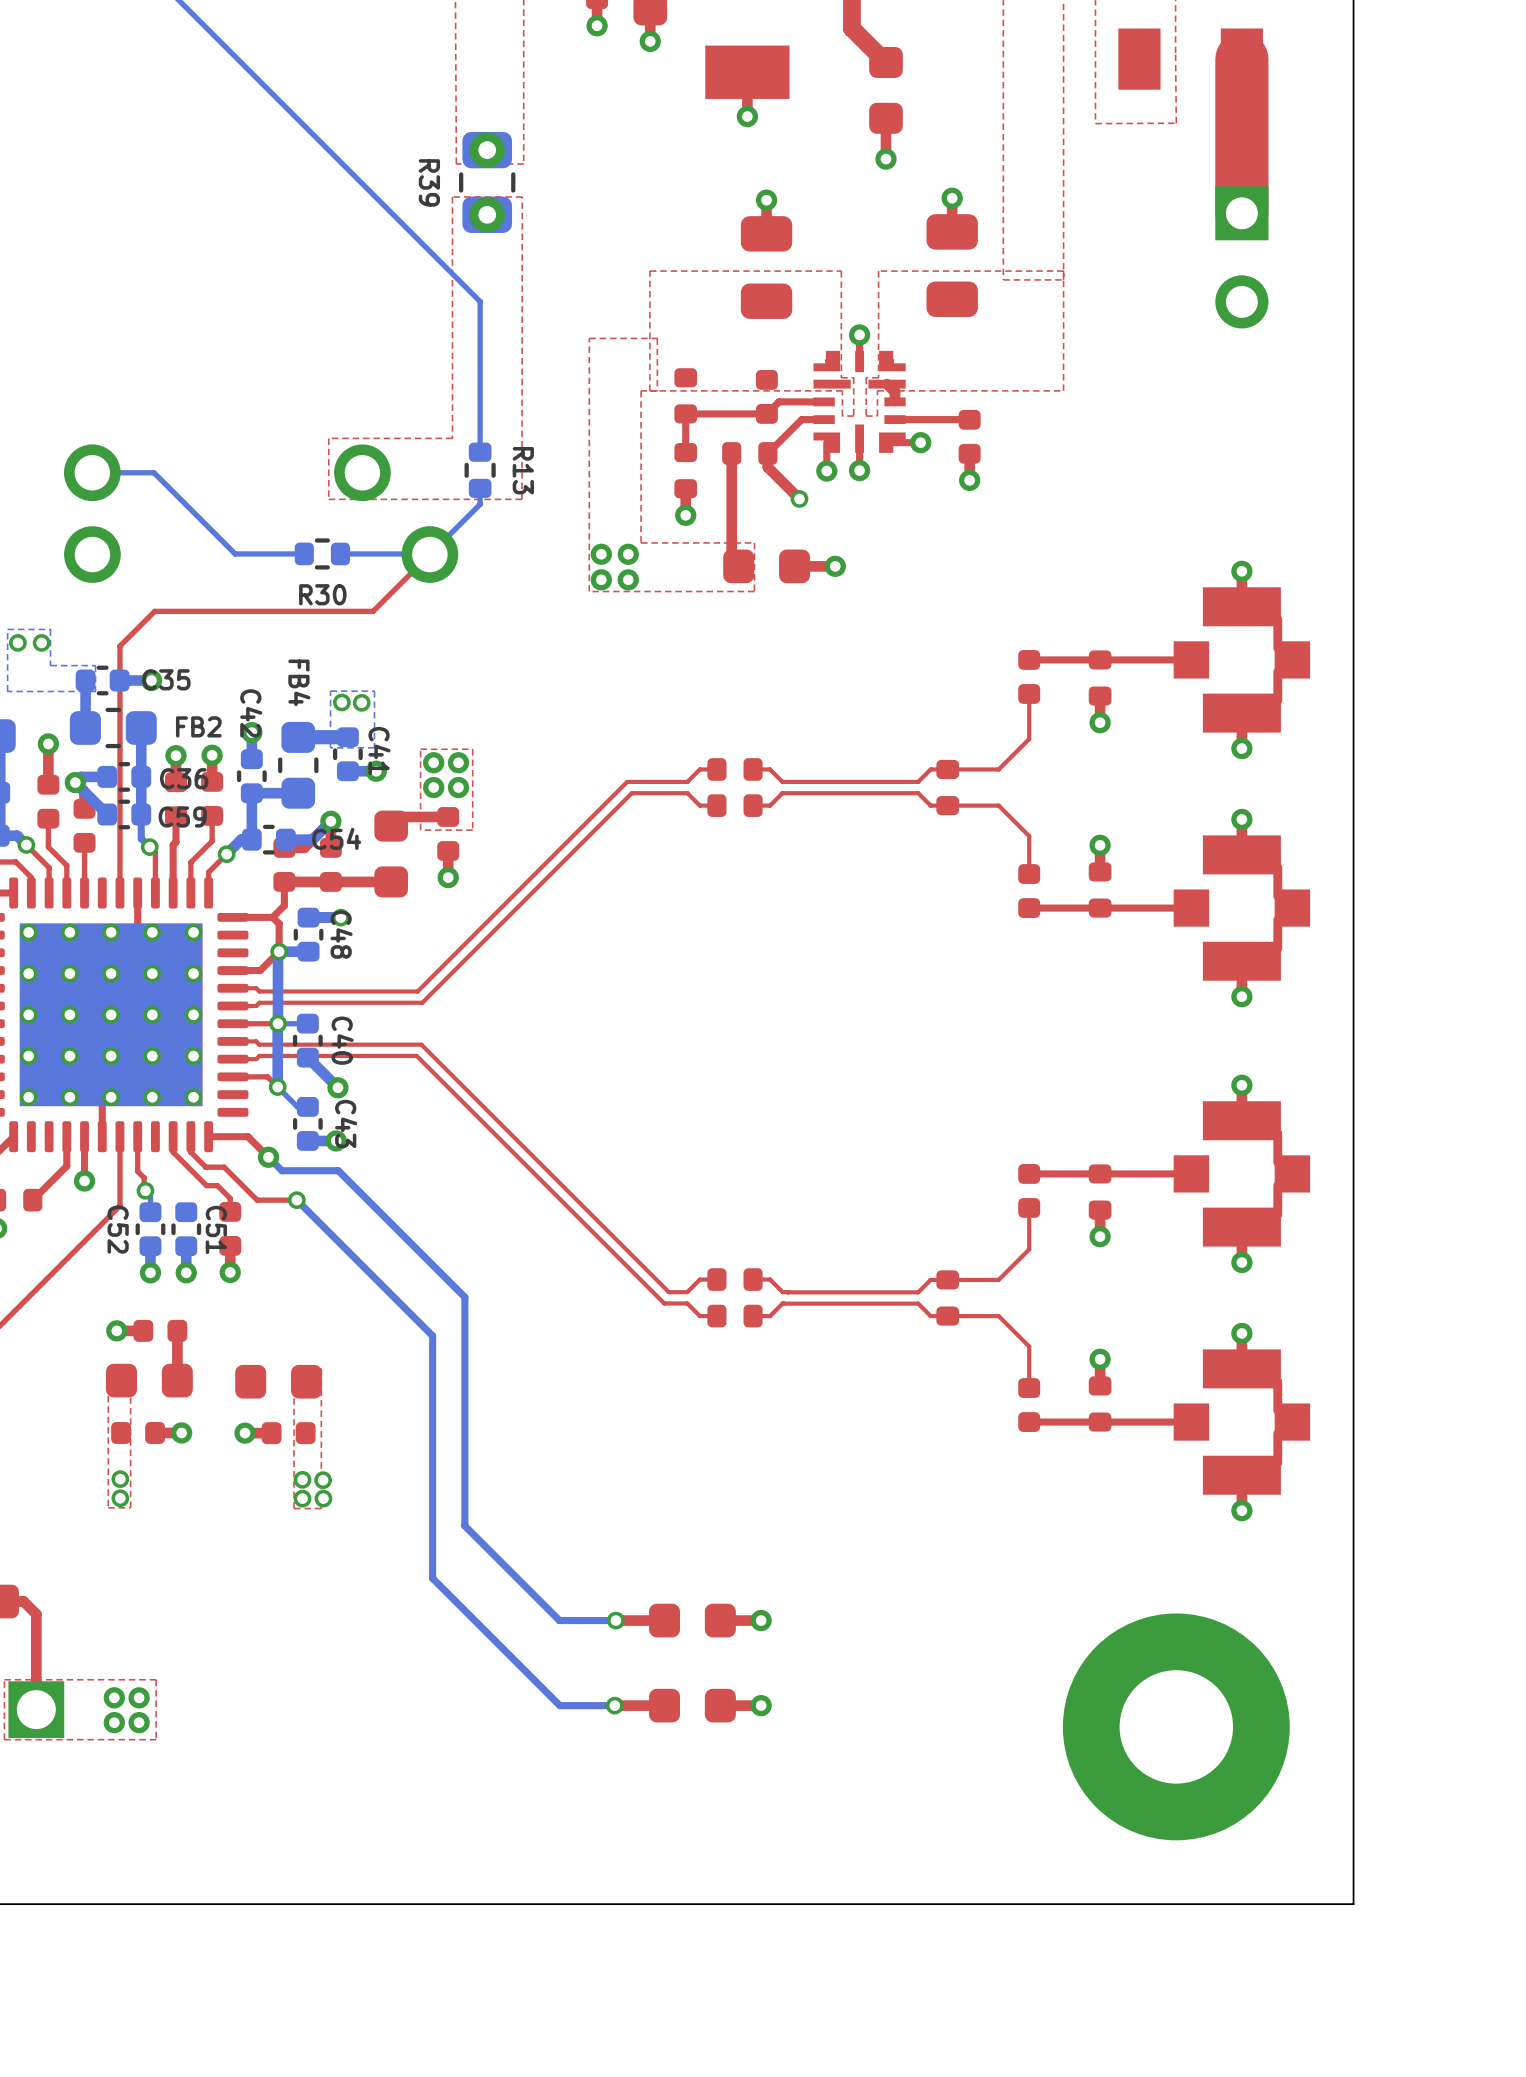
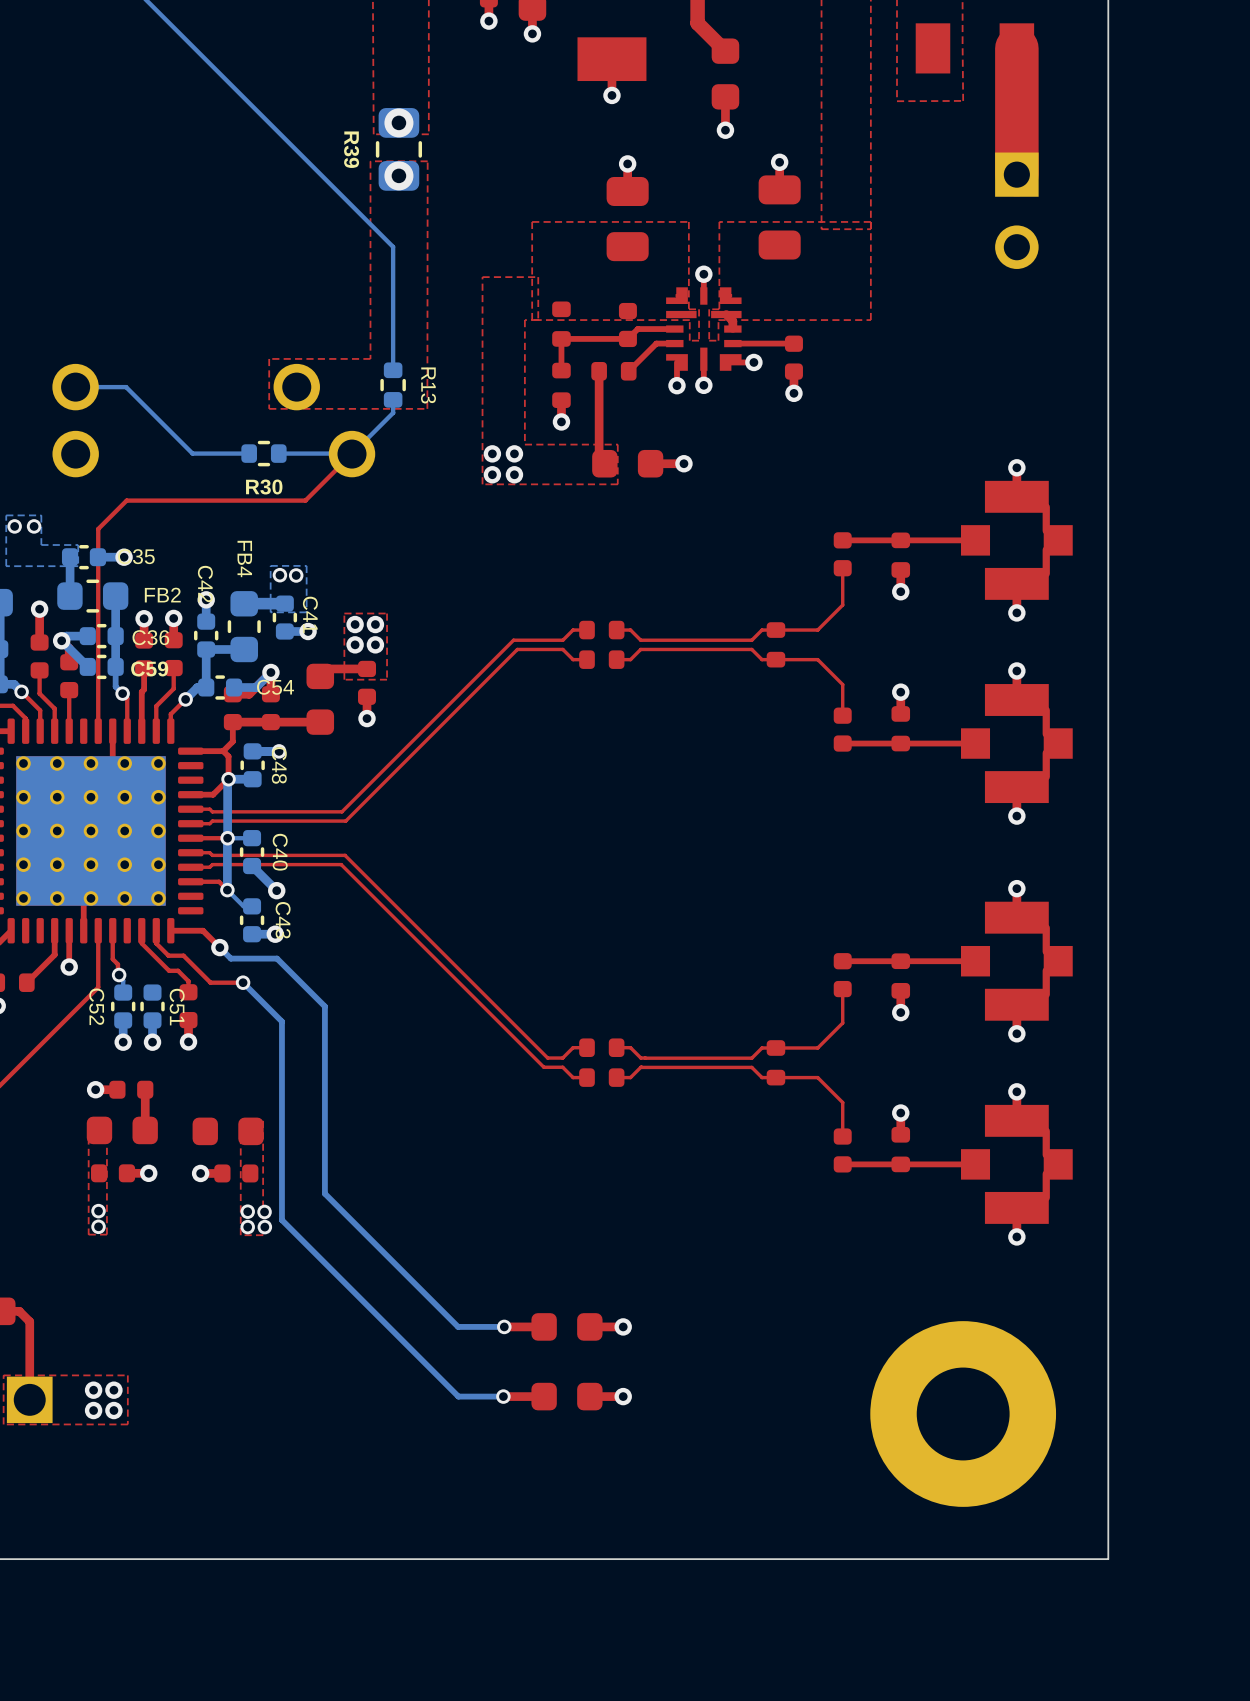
top track: (767, 453) (767, 467) (799, 499) -> none
via: (799, 499) -> none
bottom track: (396, 1229) (464, 1297) (464, 1525) -> (324, 1006) (324, 1193) (380, 1249)
bottom track: (344, 1247) (432, 1335) (432, 1578) -> (281, 1021) (281, 1220) (354, 1292)

